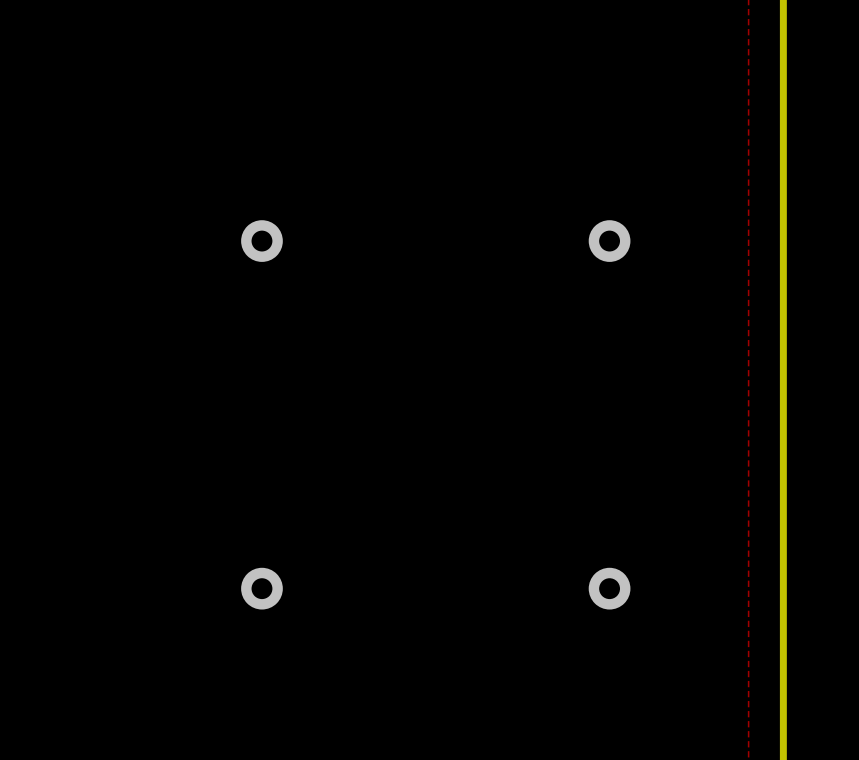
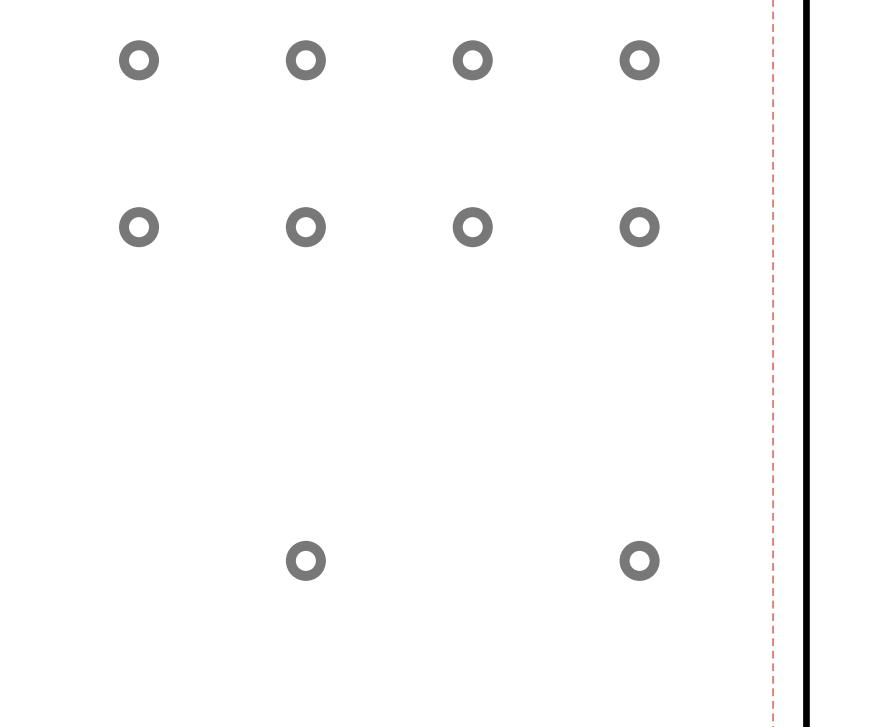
via: none -> (139, 60)
via: none -> (305, 60)
via: none -> (472, 60)
via: none -> (639, 60)
via: none -> (139, 227)
via: none -> (472, 227)

